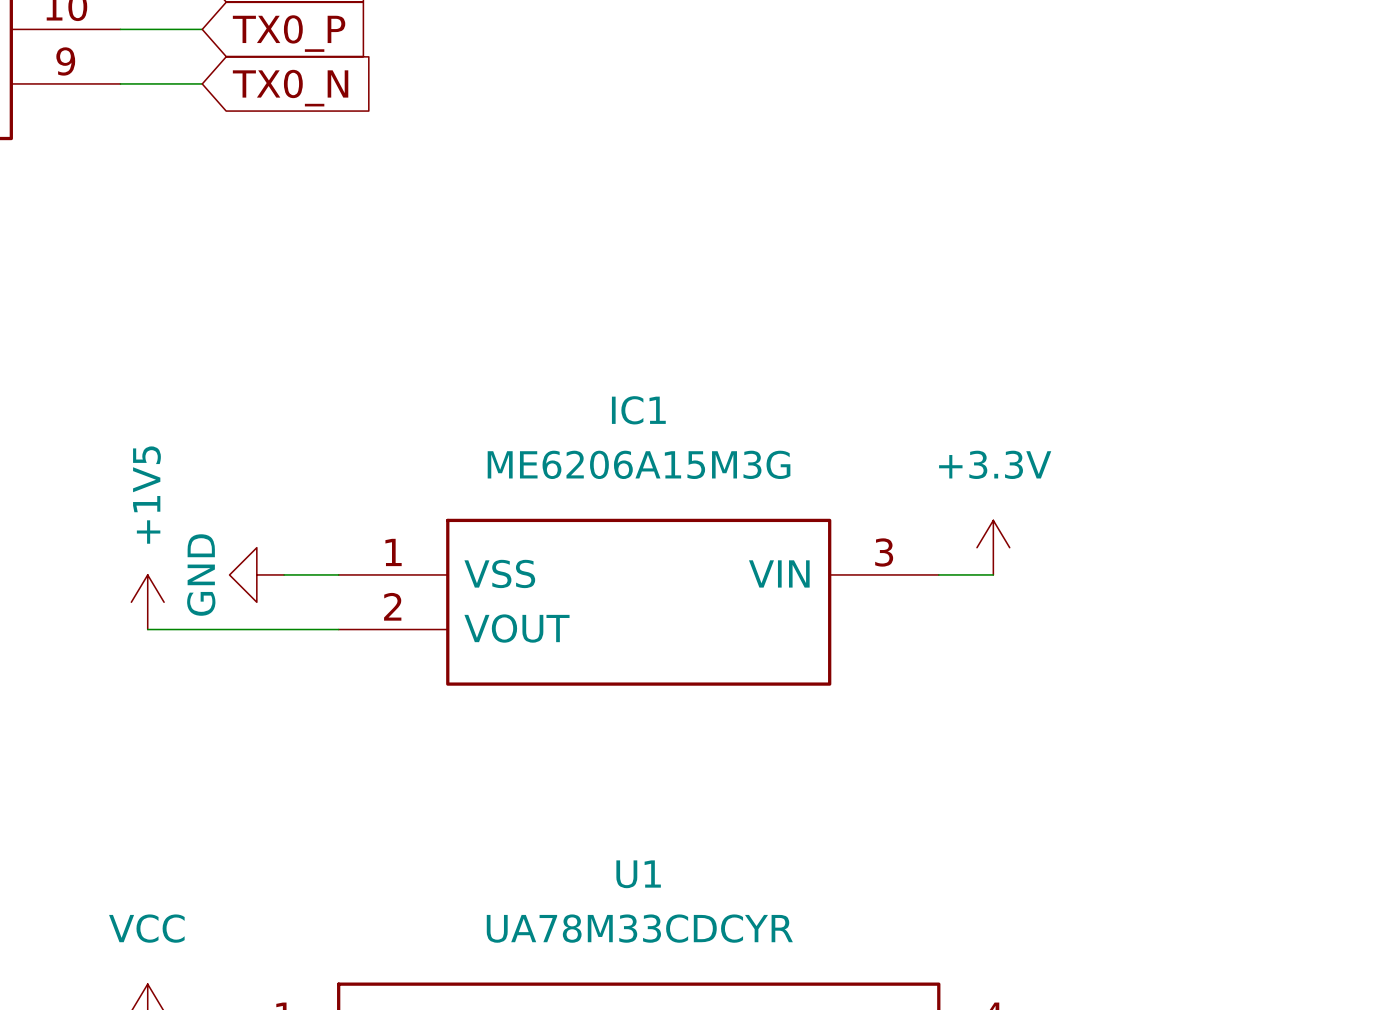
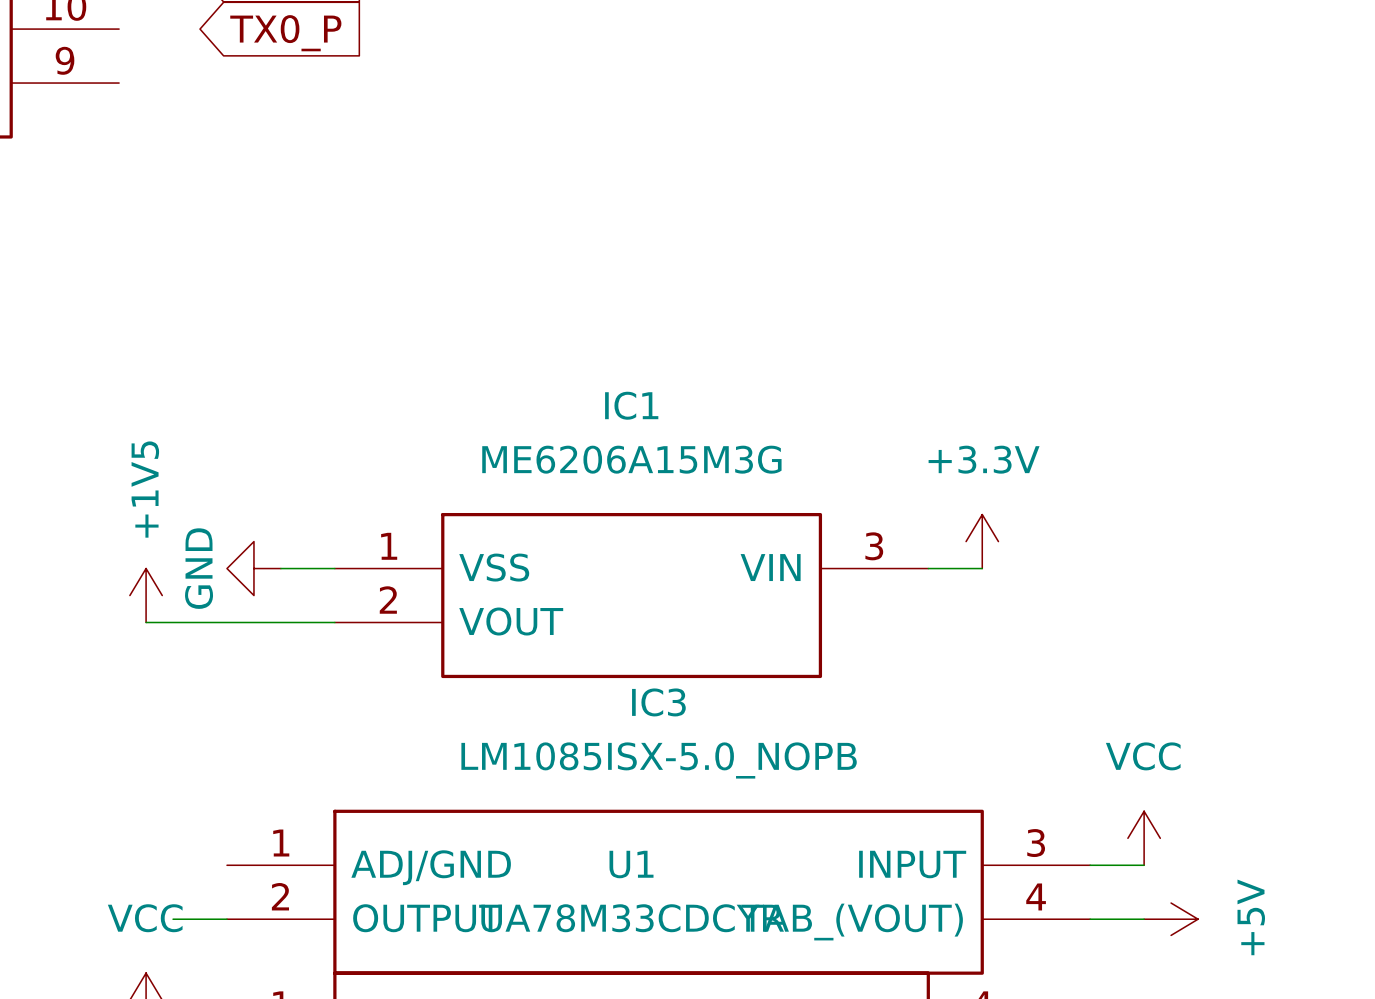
wire: (120, 29) (202, 29) -> none
wire: (120, 83) (202, 83) -> none
global label: TX0_N (290, 88) -> none
power symbol: none -> VCC (1144, 838)
wire: none -> (1090, 865) (1144, 865)
IC3: none -> LM1085ISX-5.0_NOPB (658, 892)
wire: none -> (173, 919) (226, 919)
wire: none -> (1090, 919) (1144, 919)
power symbol: none -> +5V (1171, 919)

